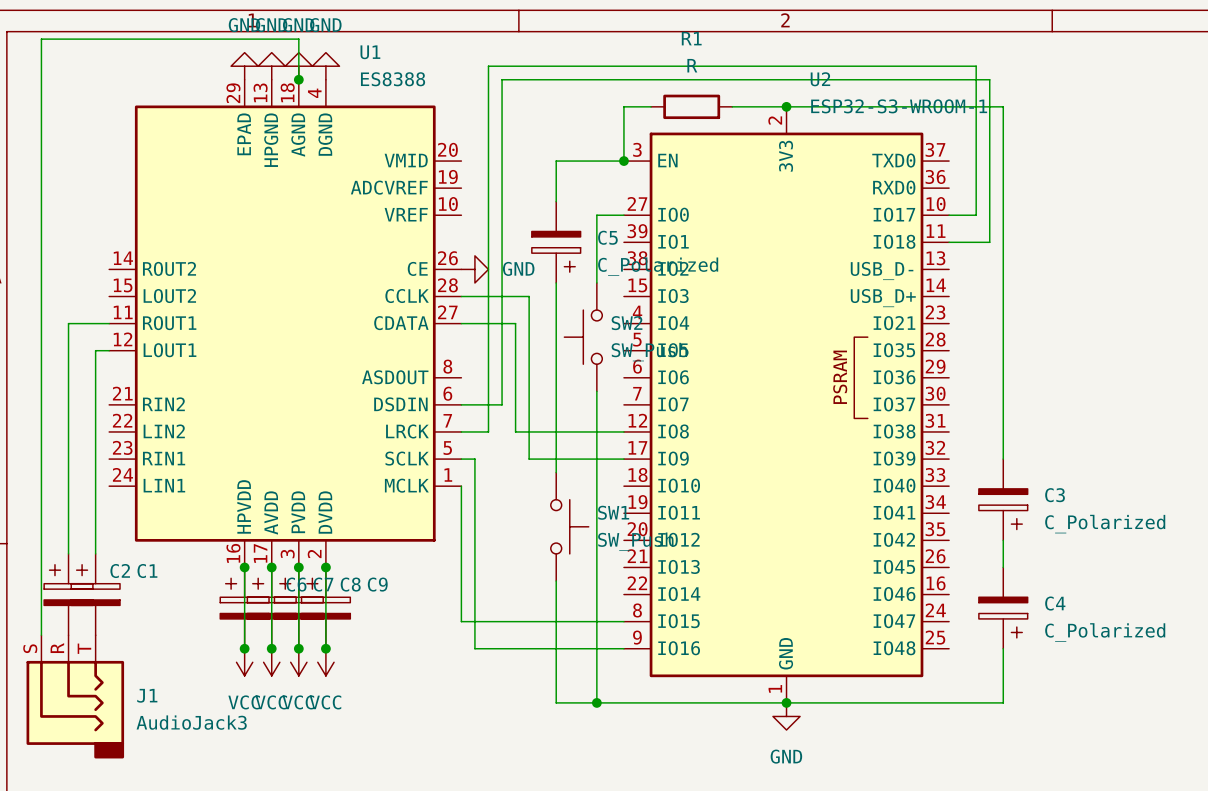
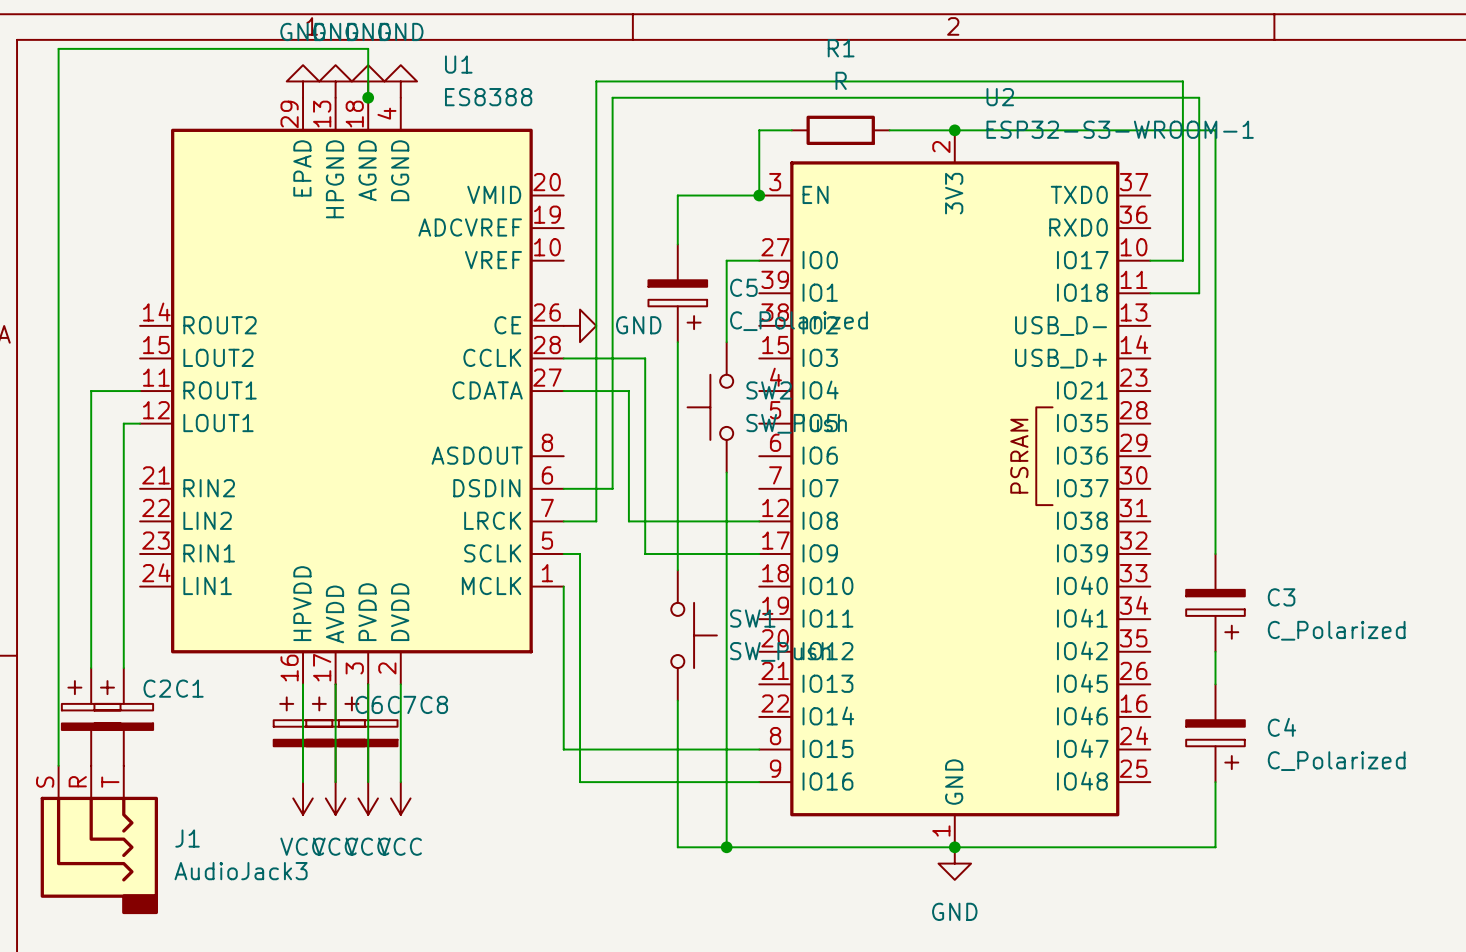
junction: (244, 567) -> none
junction: (271, 567) -> none
junction: (298, 567) -> none
junction: (325, 567) -> none
C9: (325, 608) -> none
junction: (244, 648) -> none
junction: (271, 648) -> none
junction: (298, 648) -> none
junction: (325, 648) -> none

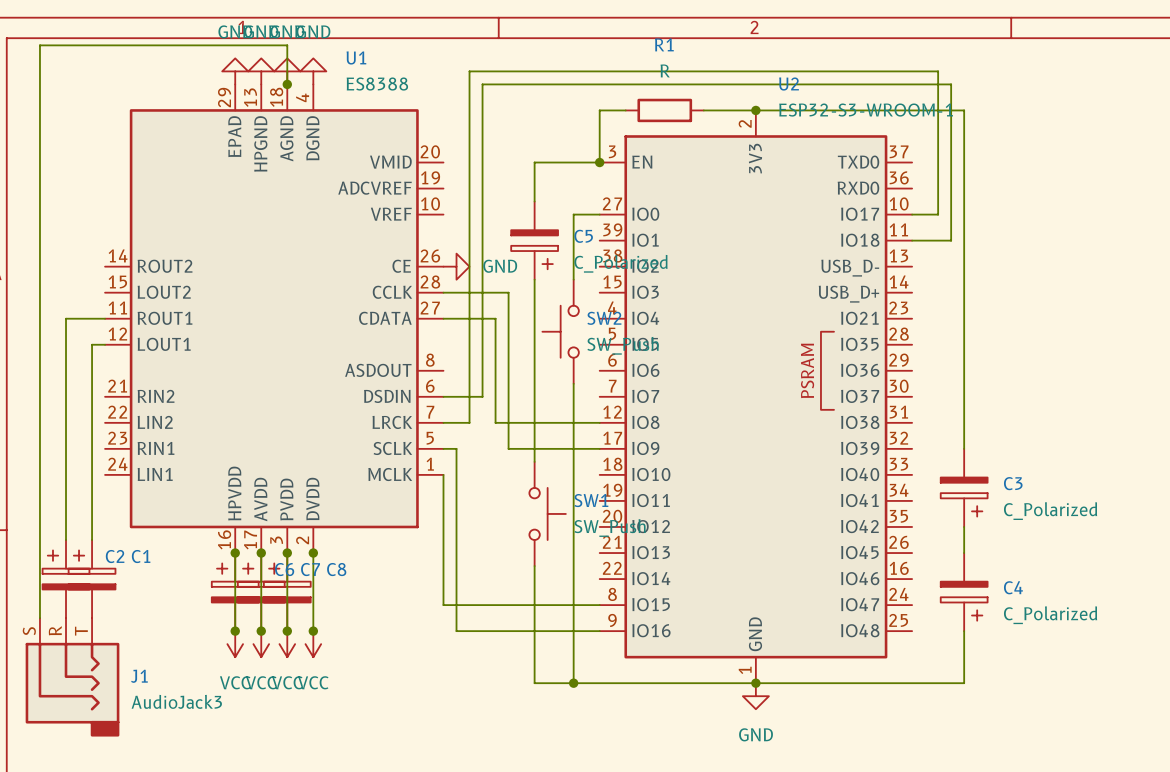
junction: none -> (235, 553)
junction: none -> (261, 553)
junction: none -> (287, 553)
junction: none -> (313, 553)
junction: none -> (235, 631)
junction: none -> (261, 631)
junction: none -> (287, 631)
junction: none -> (313, 631)

